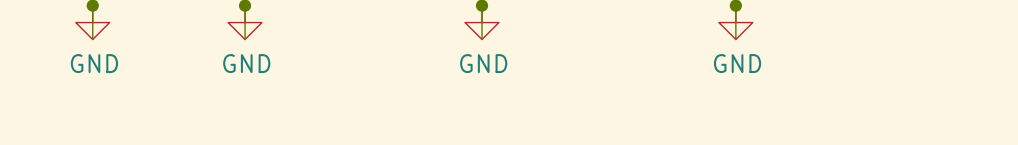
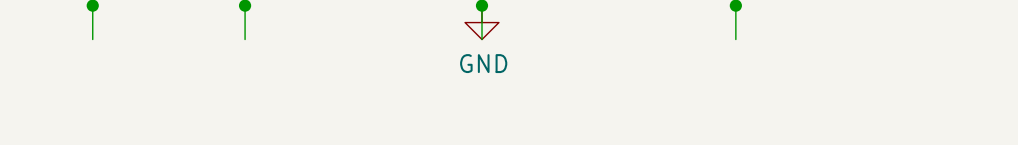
power symbol: GND (92, 22) -> none
power symbol: GND (245, 22) -> none
power symbol: GND (735, 22) -> none

